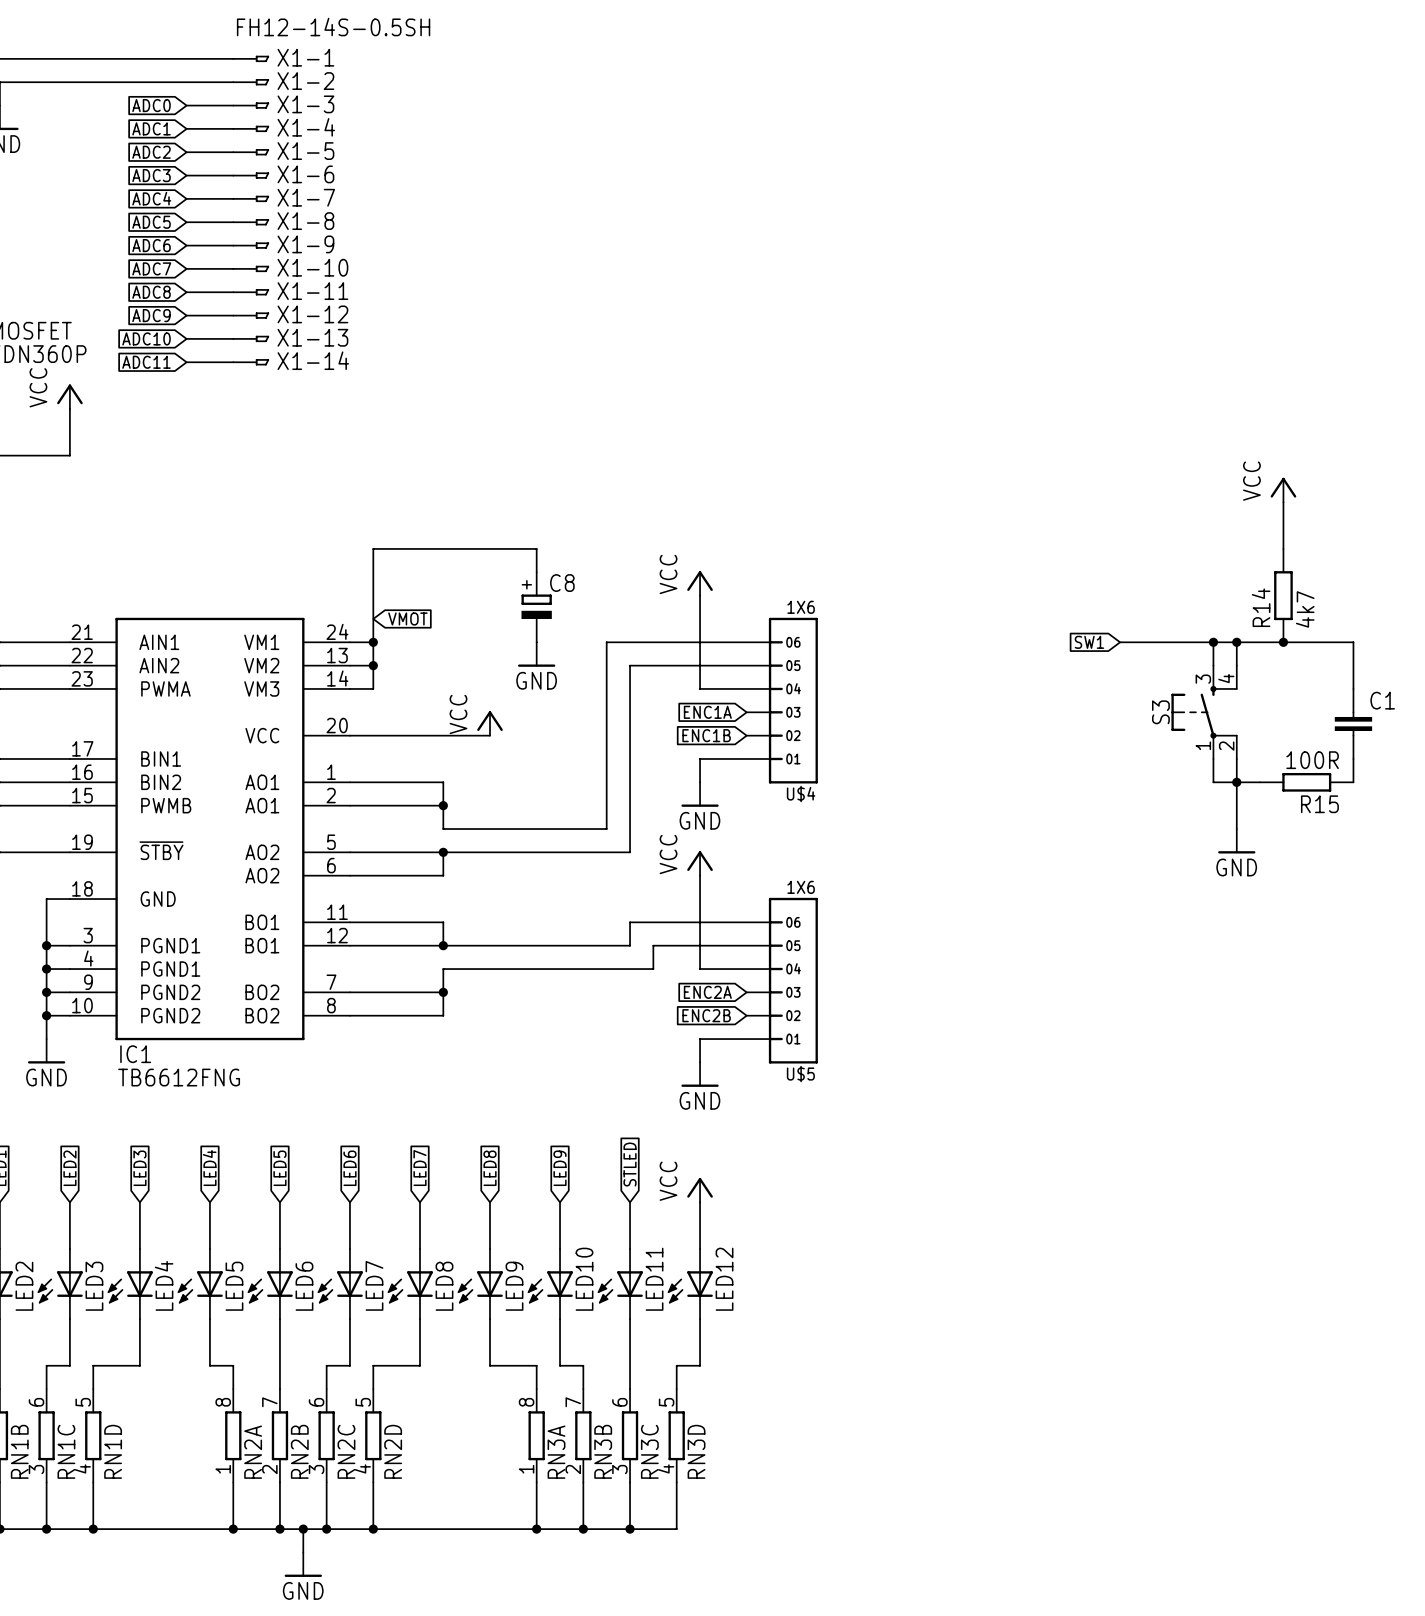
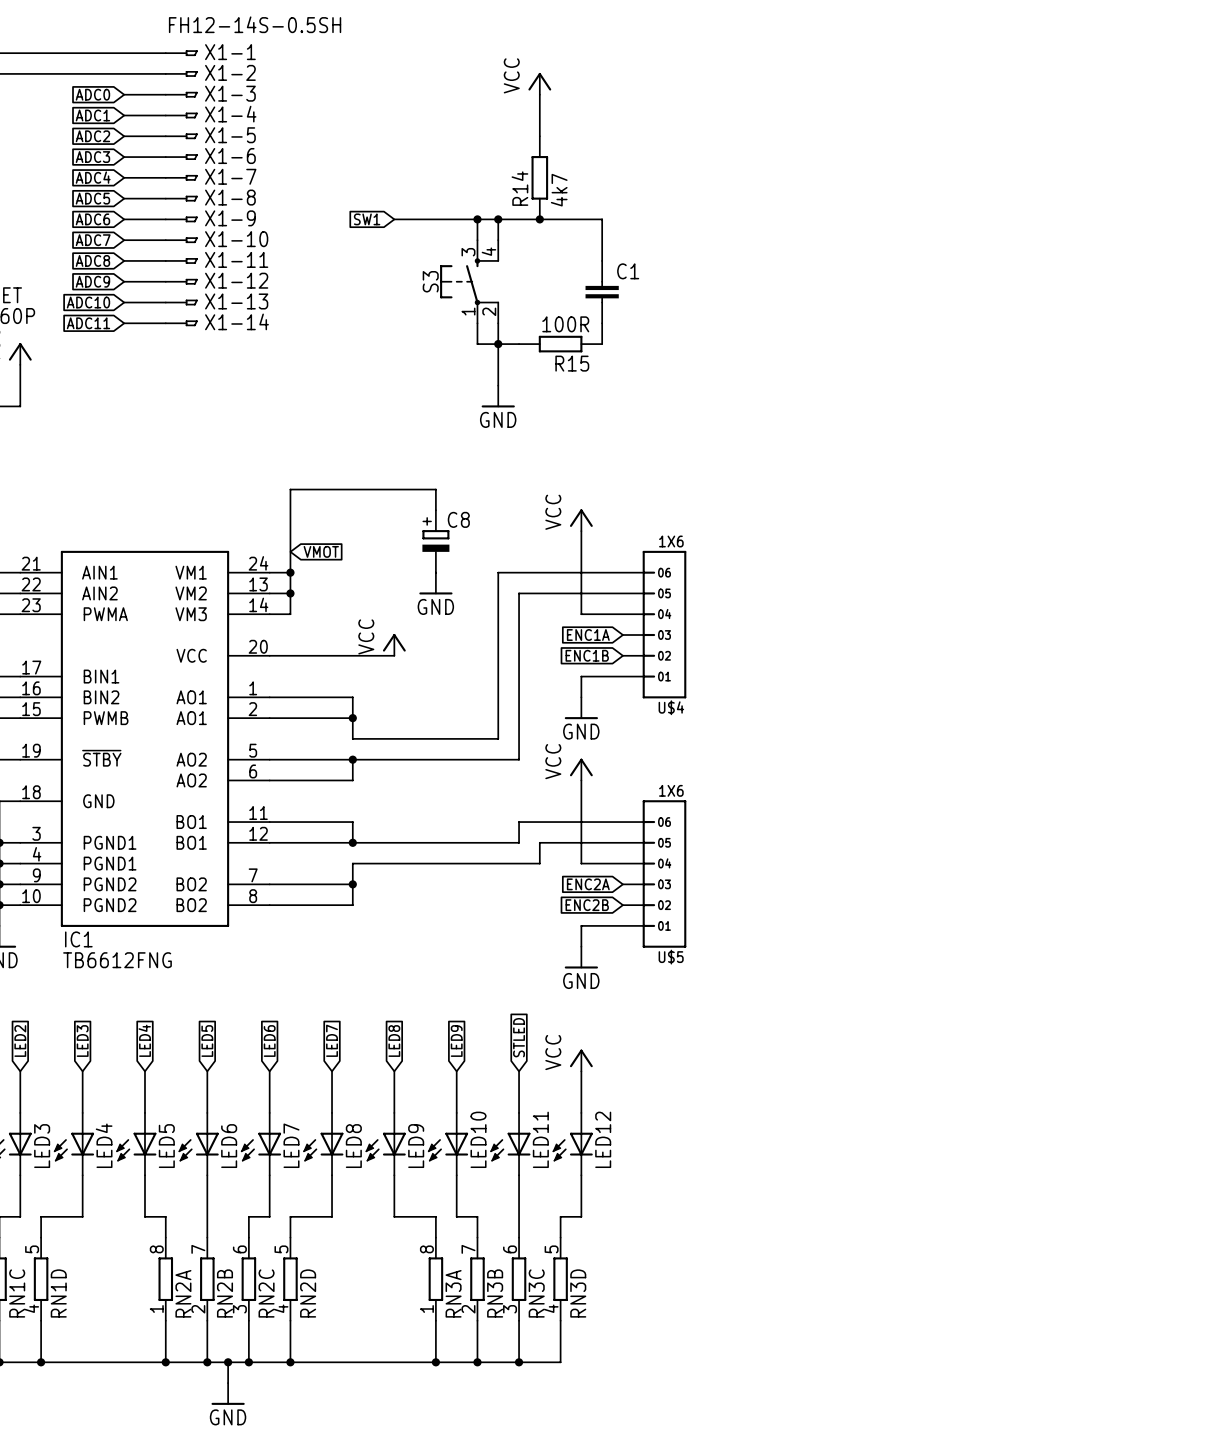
power symbol: none -> VCC (539, 83)
wire: none -> (539, 94) (539, 136)
global label: none -> SW1 (367, 219)
wire: none -> (394, 219) (602, 219) (602, 260)
wire: none -> (477, 219) (477, 240)
junction: none -> (477, 219)
wire: none -> (498, 219) (498, 240)
junction: none -> (498, 219)
junction: none -> (539, 219)
wire: none -> (477, 323) (477, 344) (519, 344)
wire: none -> (498, 323) (498, 385)
wire: none -> (602, 323) (602, 344)
junction: none -> (498, 344)
power symbol: none -> GND (498, 396)
power symbol: VCC (1283, 490) -> none
wire: (1283, 502) (1283, 548) -> none
R14 position: (1283, 595) -> (539, 177)
global label: SW1 (1089, 642) -> none
wire: (1120, 642) (1353, 642) (1353, 688) -> none
wire: (1213, 642) (1213, 665) -> none
junction: (1213, 642) -> none
wire: (1236, 642) (1236, 665) -> none
junction: (1236, 642) -> none
junction: (1283, 642) -> none
S3 position: (1204, 712) -> (469, 281)
C1 position: (1353, 723) -> (602, 292)
wire: (1213, 758) (1213, 782) (1260, 782) -> none
wire: (1236, 758) (1236, 829) -> none
wire: (1353, 758) (1353, 782) -> none
junction: (1236, 782) -> none
R15 position: (1306, 782) -> (560, 344)
power symbol: GND (1236, 841) -> none

